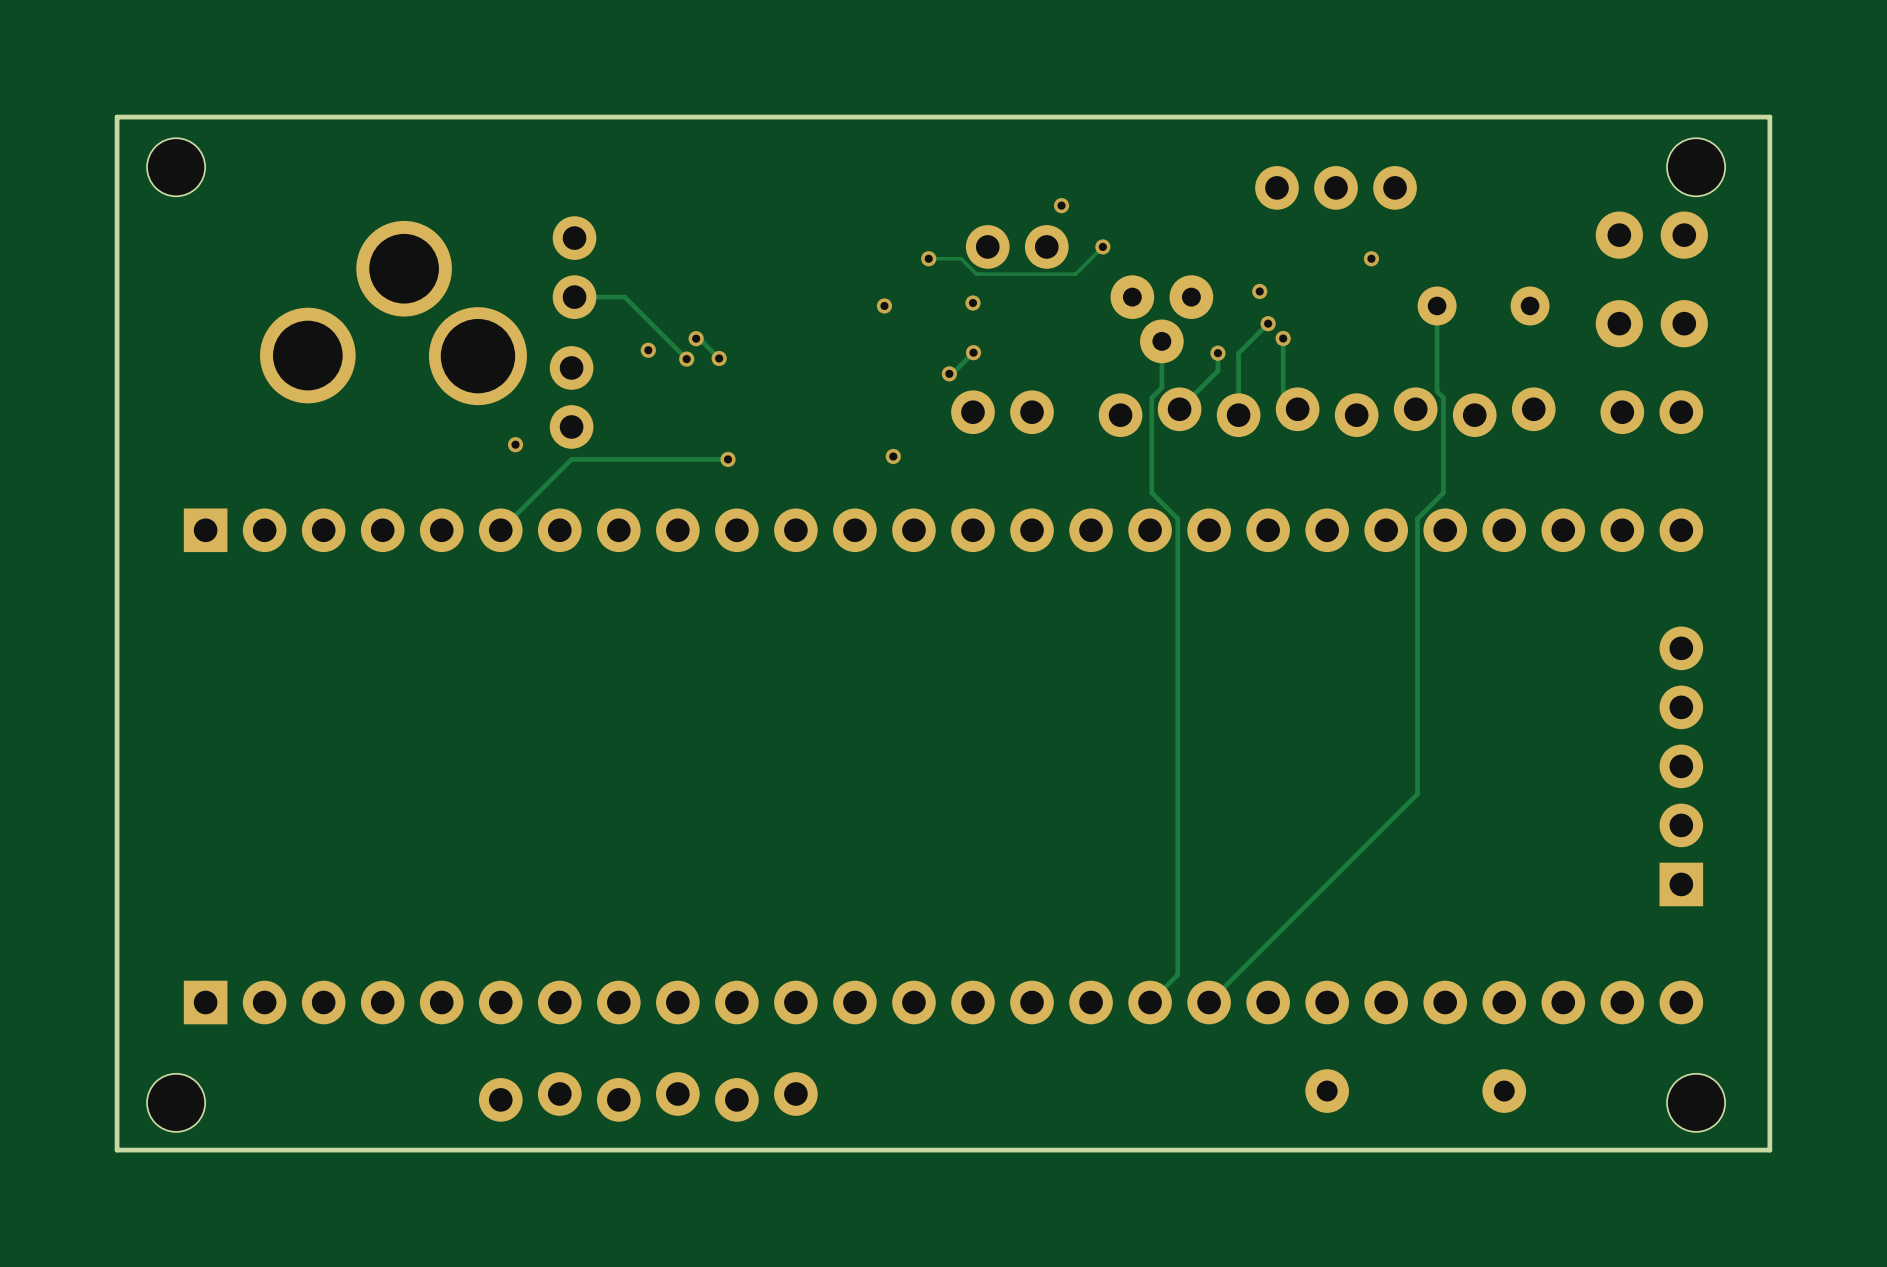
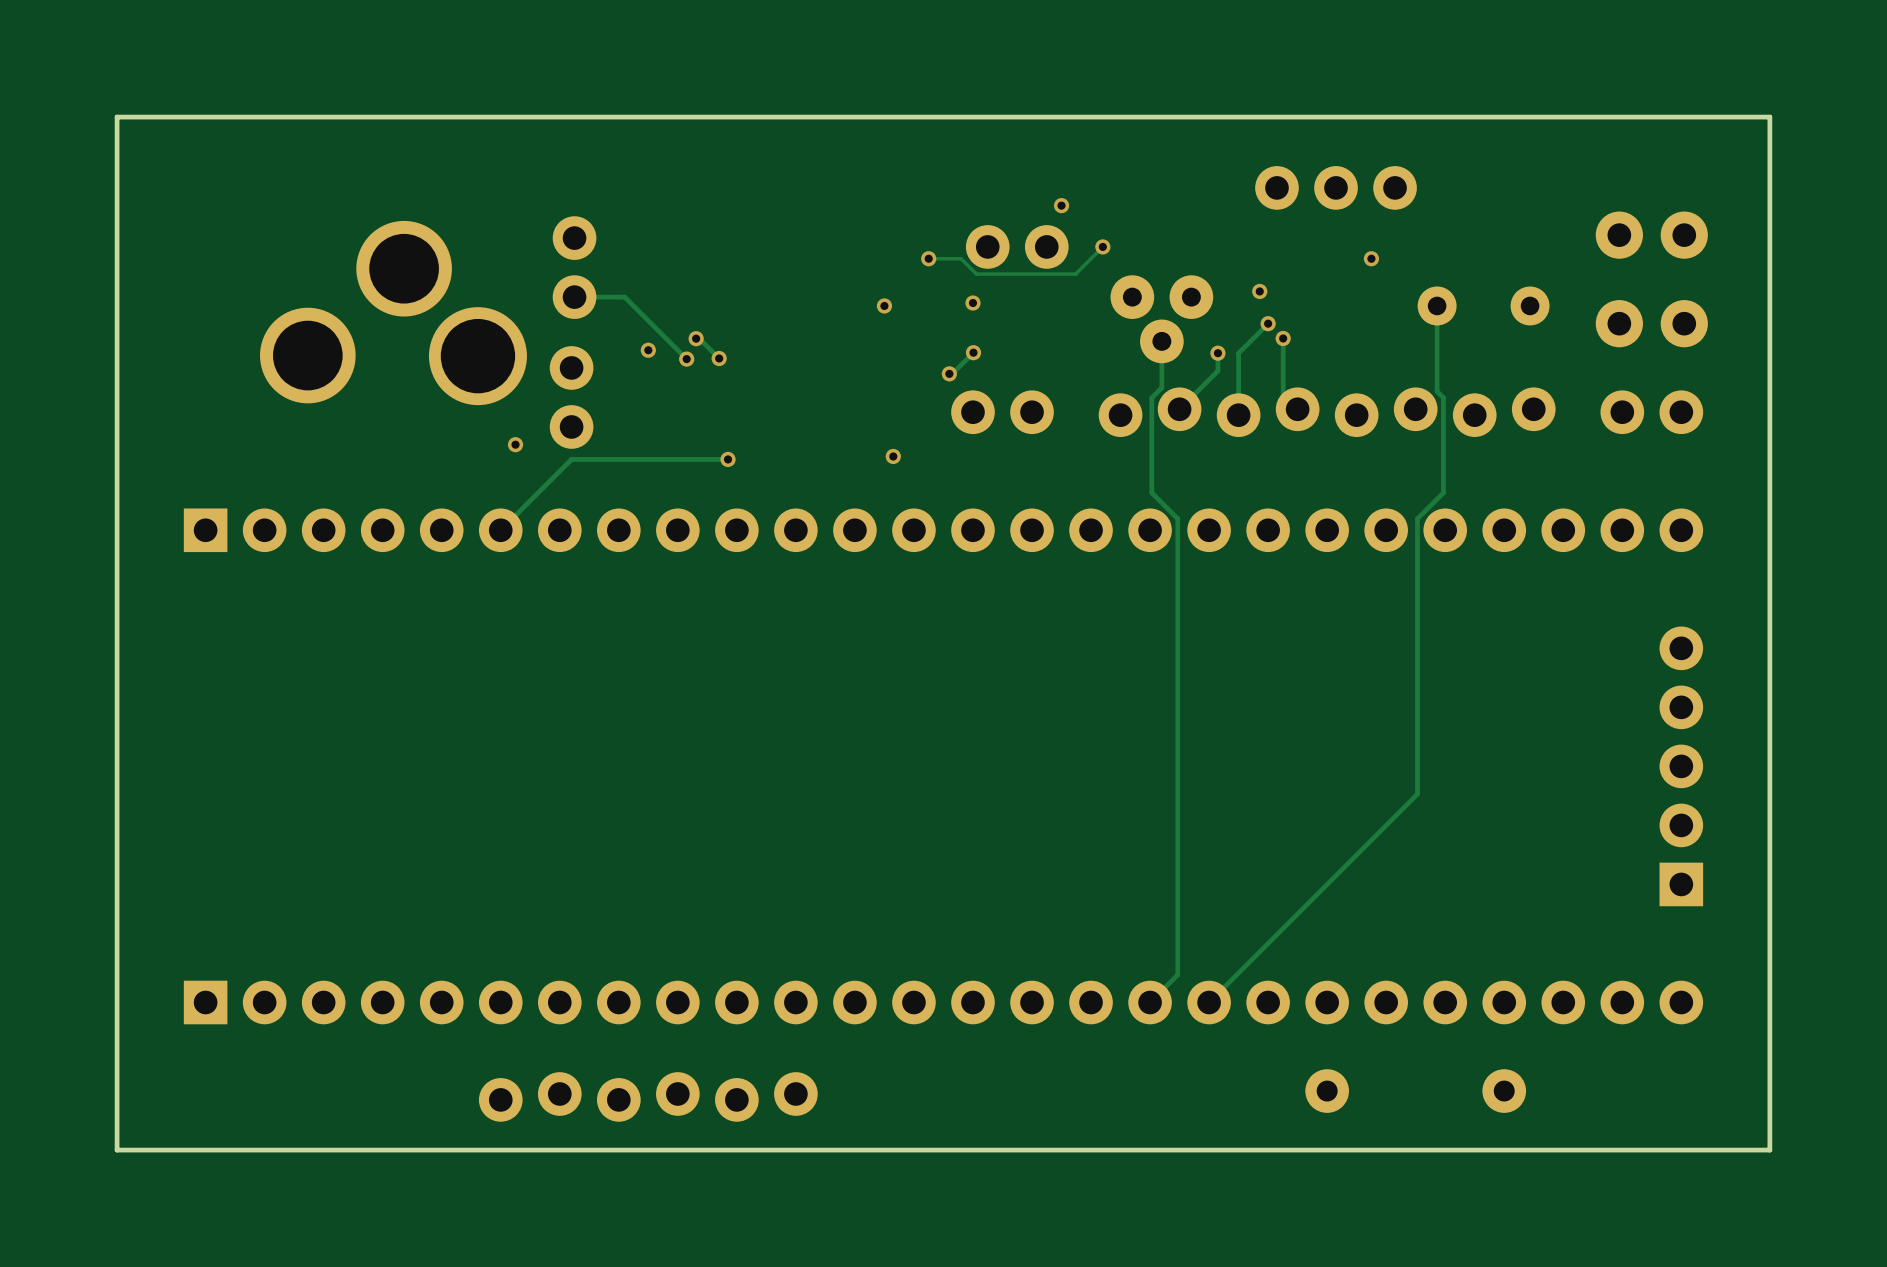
hole: (176, 167) -> none
hole: (1696, 167) -> none
hole: (176, 1102) -> none
hole: (1696, 1102) -> none

